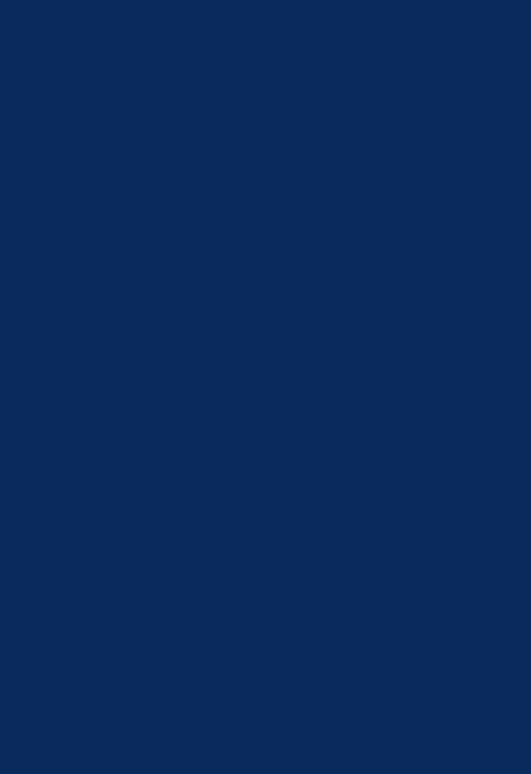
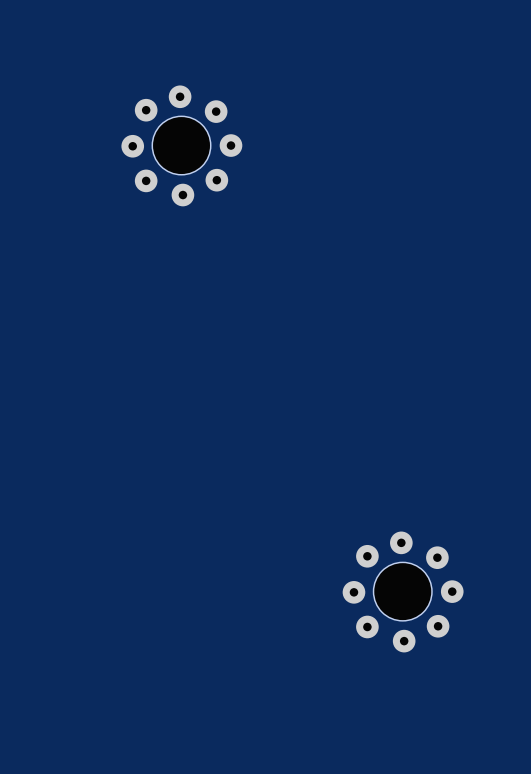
part: none -> (181, 145)
part: none -> (403, 591)

